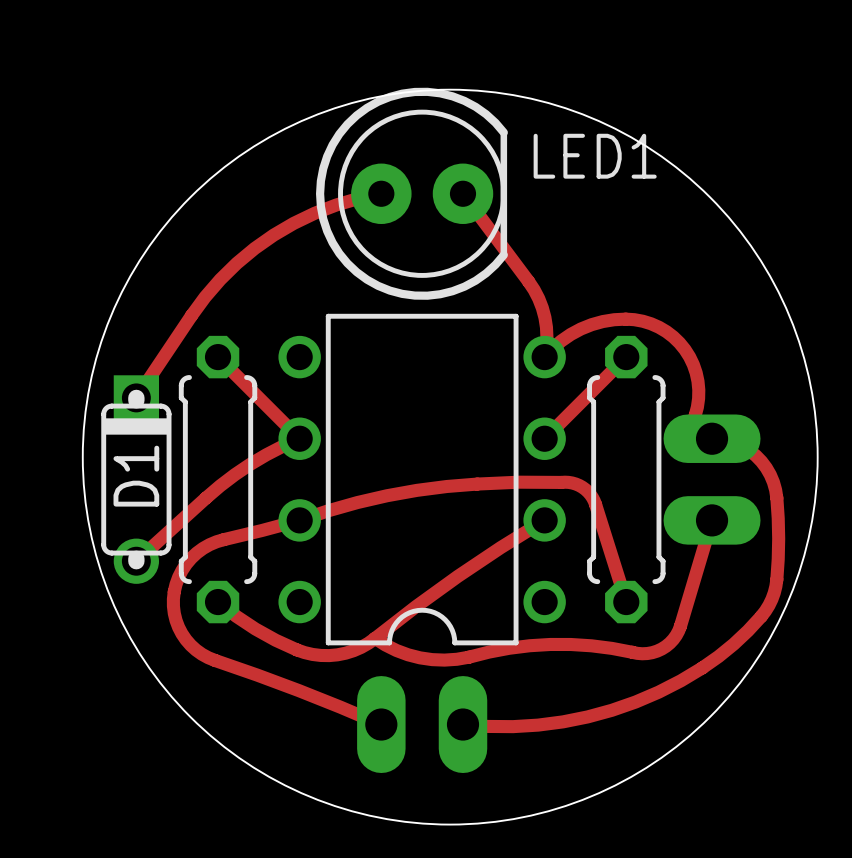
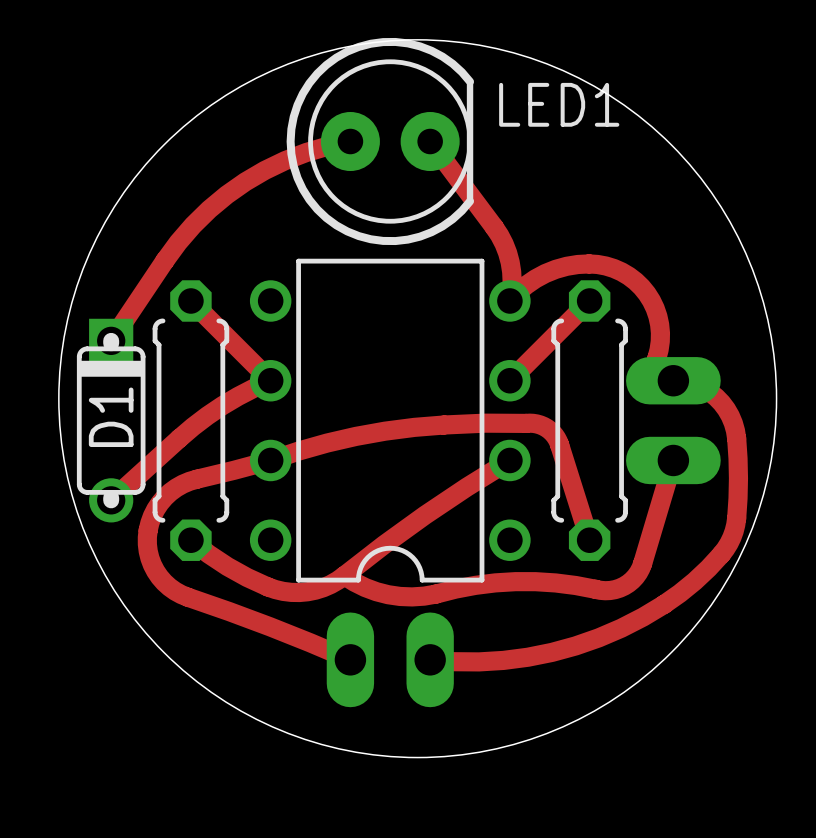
top track width: thin (381, 193) (336, 204) (314, 213) (273, 235) (236, 263) (205, 297) (136, 397) -> thick (350, 141) (306, 152) (285, 160) (245, 181) (209, 209) (178, 242) (111, 340)
top track width: thin (462, 193) (528, 281) (538, 298) (546, 327) (544, 357) (570, 334) (591, 324) (614, 319) (634, 319) (651, 323) (666, 331) (679, 342) (689, 356) (697, 381) (698, 398) (694, 419) (696, 429) (705, 437) (727, 440) (742, 446) (755, 455) (766, 467) (775, 490) (778, 538) (775, 586) (765, 611) (733, 644) (702, 667) (681, 680) (635, 702) (611, 710) (563, 721) (513, 726) (462, 724) -> thick (430, 141) (494, 227) (504, 243) (511, 272) (509, 300) (535, 278) (555, 269) (577, 264) (597, 264) (613, 268) (628, 276) (641, 287) (651, 300) (659, 324) (660, 341) (656, 362) (658, 371) (667, 379) (688, 382) (703, 388) (716, 397) (726, 409) (735, 430) (738, 478) (735, 524) (725, 548) (694, 581) (664, 604) (643, 617) (598, 637) (575, 645) (527, 657) (479, 661) (430, 659)
top track width: thin (218, 357) (299, 438) (266, 454) (234, 474) (206, 497) (136, 561) -> thick (190, 300) (270, 380) (238, 396) (207, 415) (111, 500)
top track width: thin (626, 357) (544, 438) -> thick (589, 300) (509, 380)
top track width: thin (544, 520) (457, 576) (375, 638) -> thick (509, 460) (425, 515) (344, 575)
top track width: thin (712, 520) (678, 630) (669, 643) (657, 651) (642, 653) (591, 645) (550, 644) (509, 648) (456, 659) (432, 659) (396, 650) (375, 638) -> thick (673, 460) (640, 568) (632, 580) (619, 588) (605, 590) (555, 582) (515, 581) (475, 585) (424, 596) (400, 596) (365, 587) (344, 575)
top track width: thin (218, 602) (255, 629) (275, 640) (312, 654) (329, 655) (345, 653) (361, 647) (375, 638) -> thick (190, 540) (227, 566) (247, 577) (283, 591) (299, 592) (315, 590) (330, 584) (344, 575)
top track width: thin (626, 602) (594, 501) (585, 489) (568, 482) (477, 484) (387, 495) (216, 541) (203, 548) (191, 558) (178, 577) (174, 591) (173, 606) (178, 627) (185, 639) (196, 650) (208, 657) (298, 690) (381, 724) -> thick (589, 540) (558, 441) (549, 430) (533, 423) (444, 425) (356, 436) (189, 481) (176, 487) (164, 497) (152, 515) (148, 530) (147, 544) (152, 564) (159, 577) (169, 587) (181, 594) (269, 626) (350, 659)

